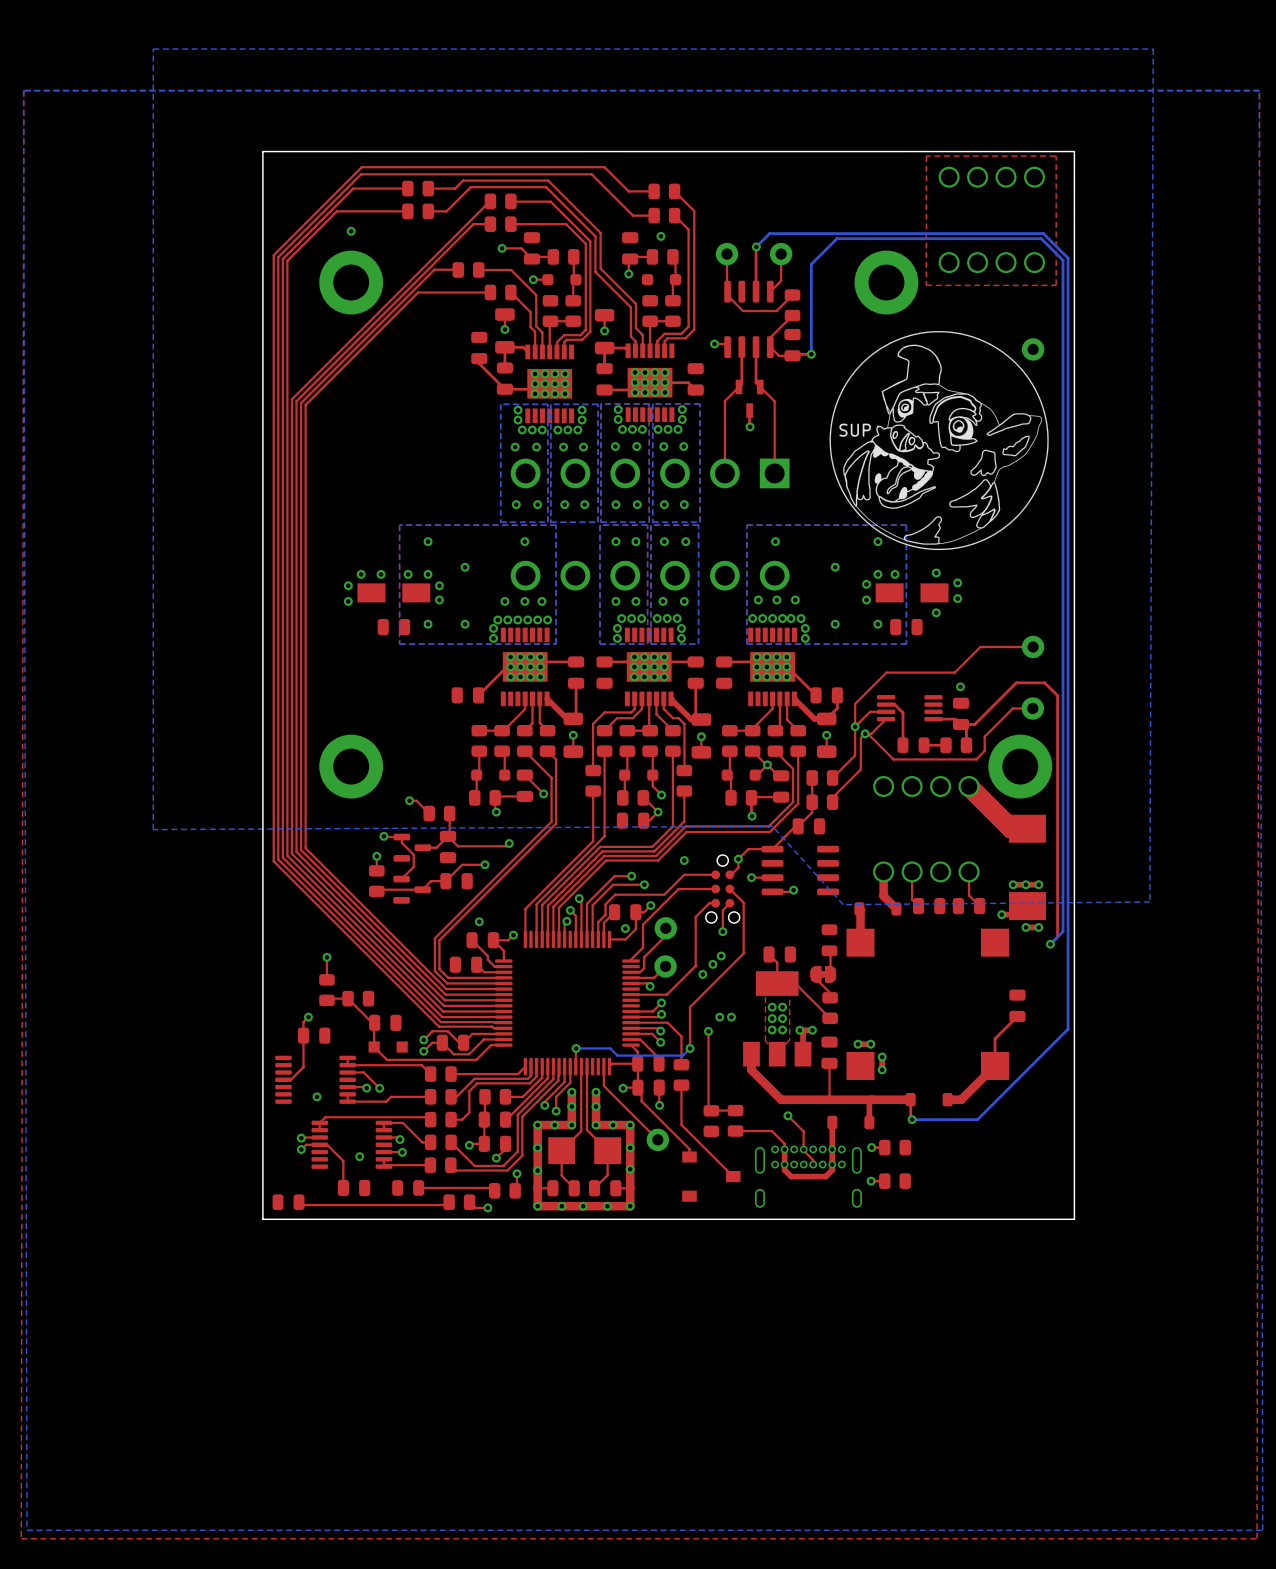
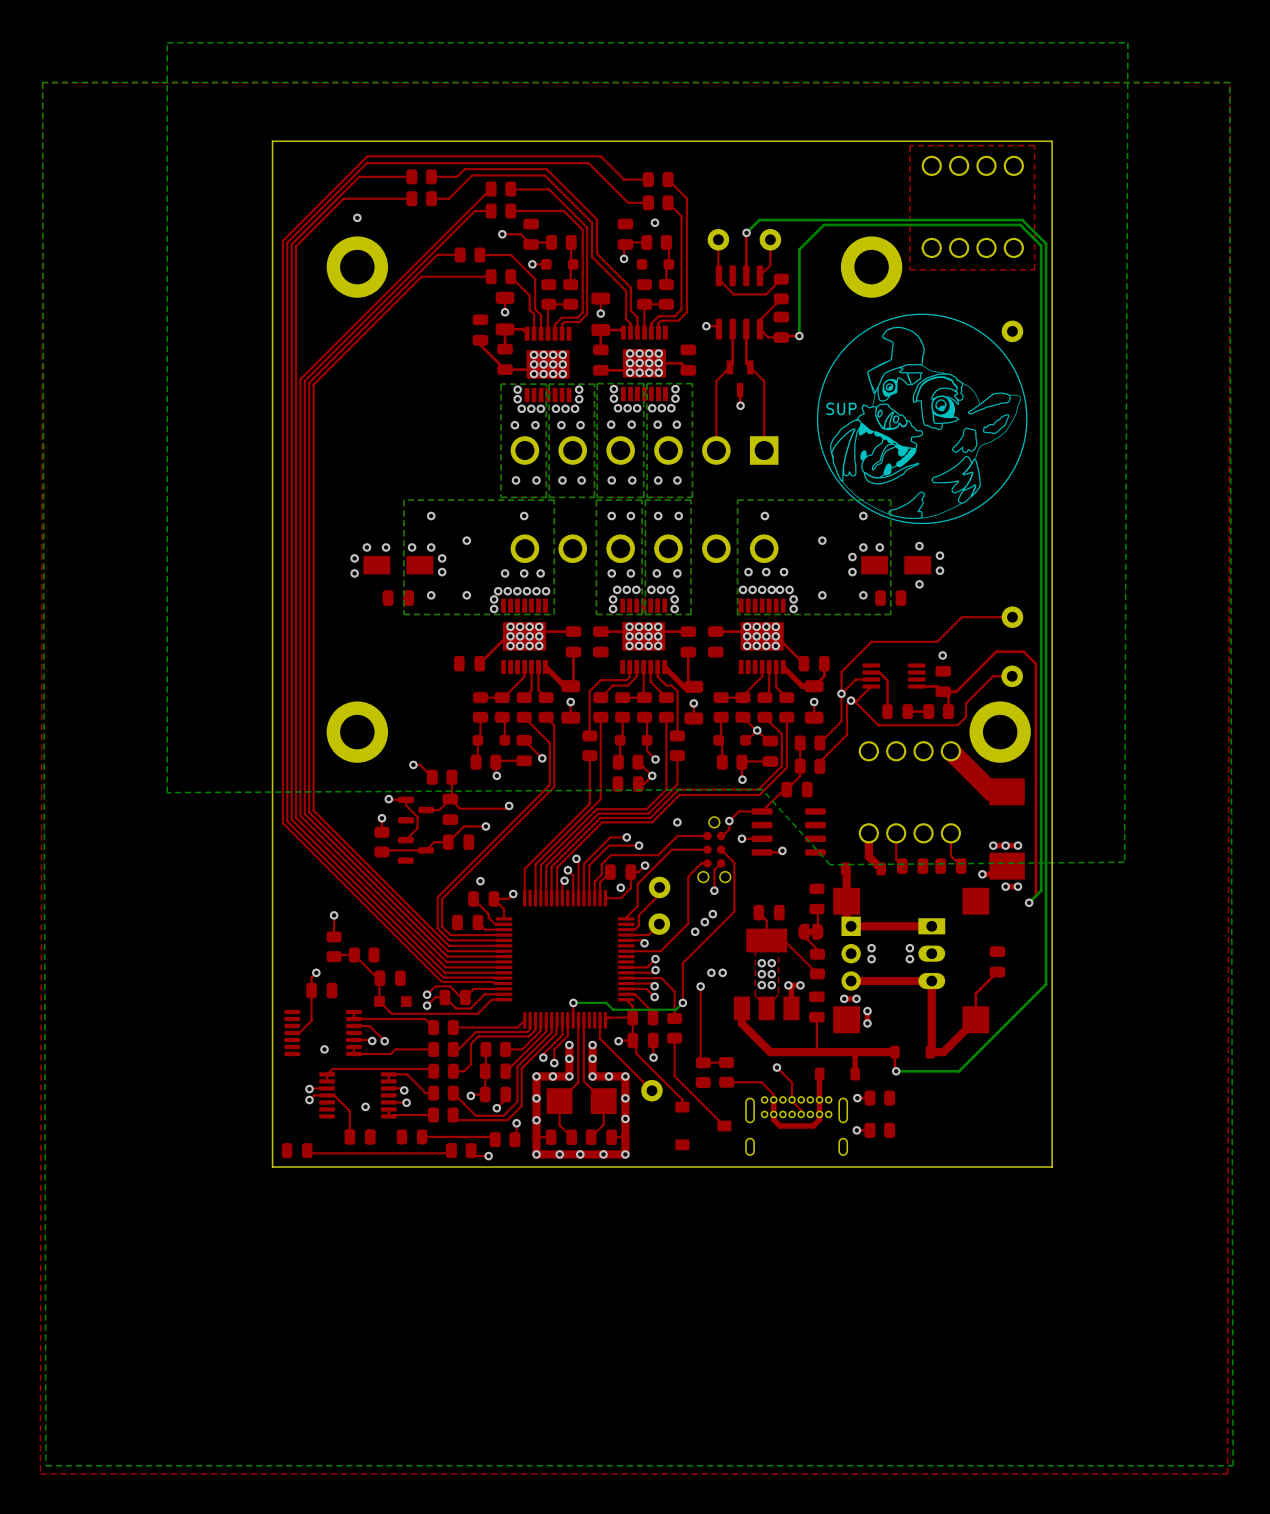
top track: none -> (846, 901) (846, 921) (851, 926) (931, 926)
via: none -> (871, 948)
via: none -> (909, 948)
part: none -> (851, 953)
part: none -> (931, 953)
via: none -> (871, 959)
via: none -> (909, 959)
top track: none -> (851, 981) (931, 981) (930, 1052)

